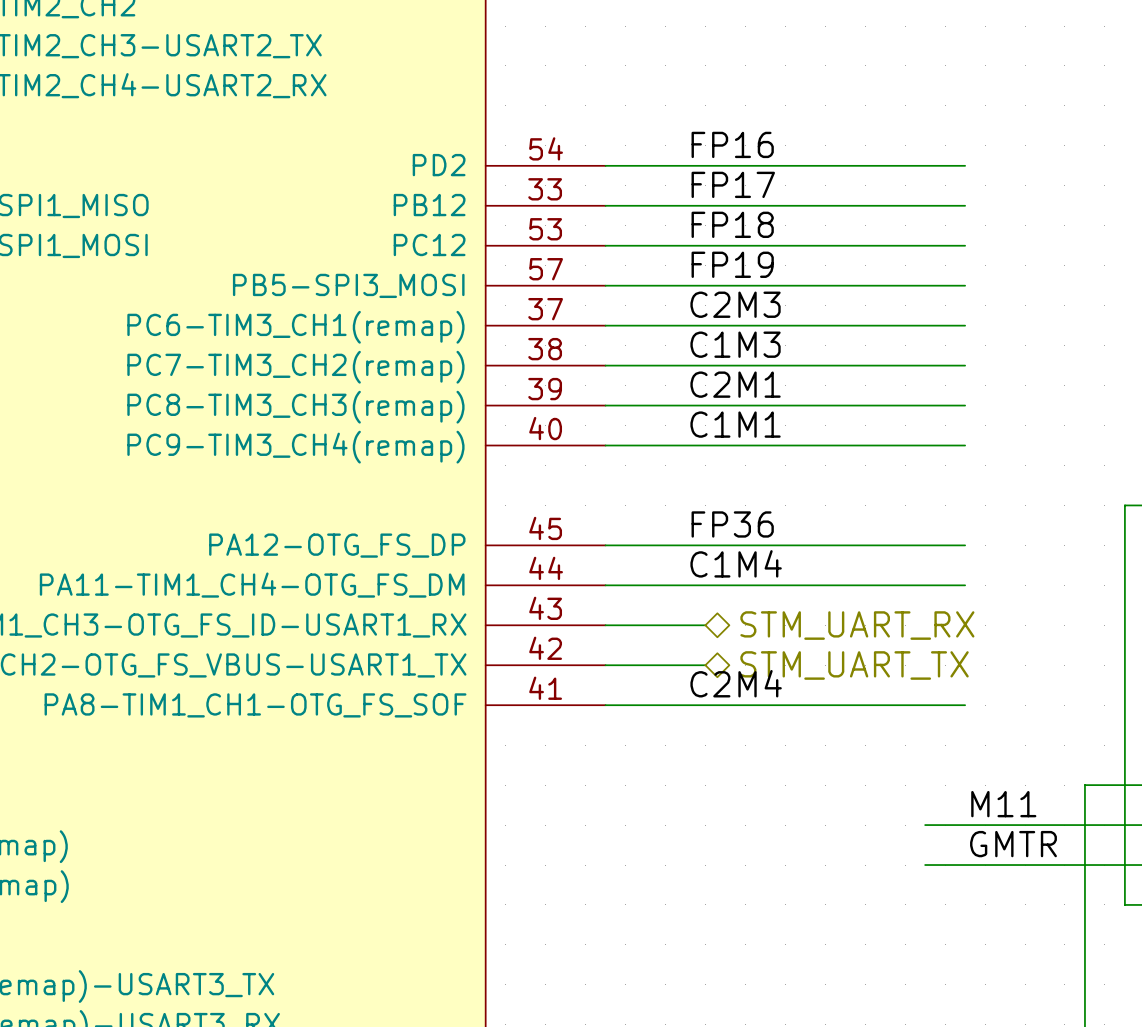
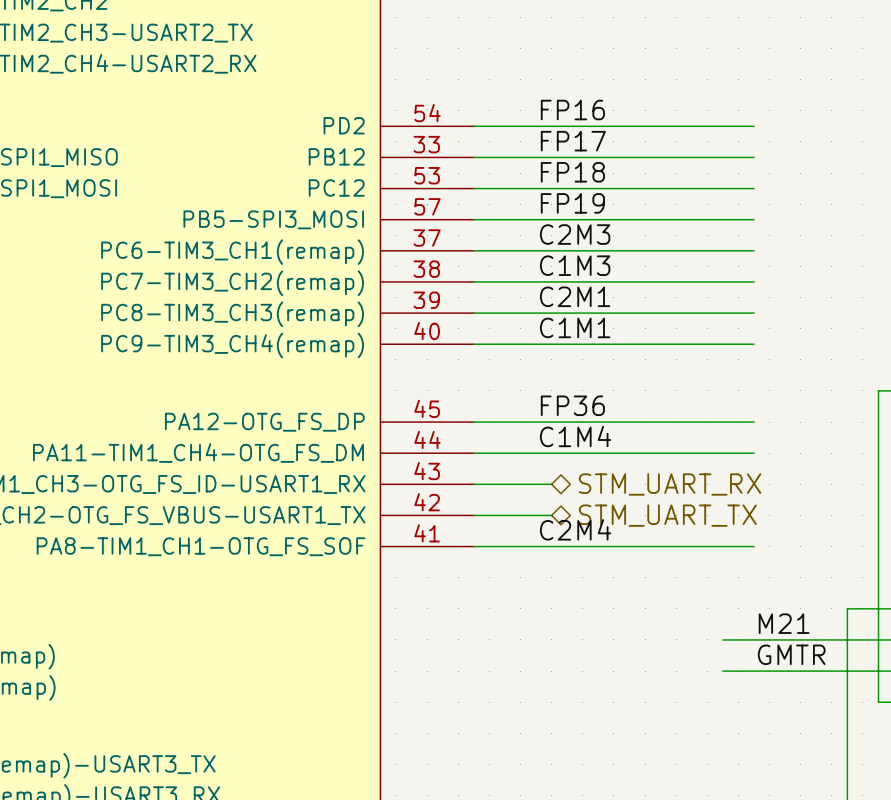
label: M11 (1003, 804) -> M21 (784, 623)

